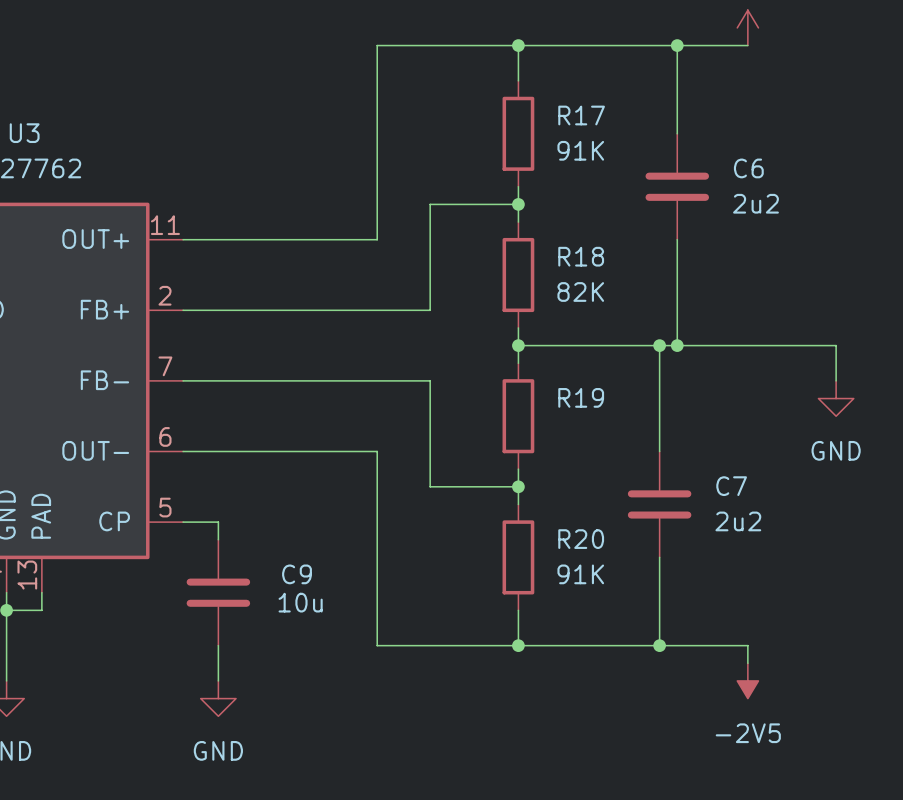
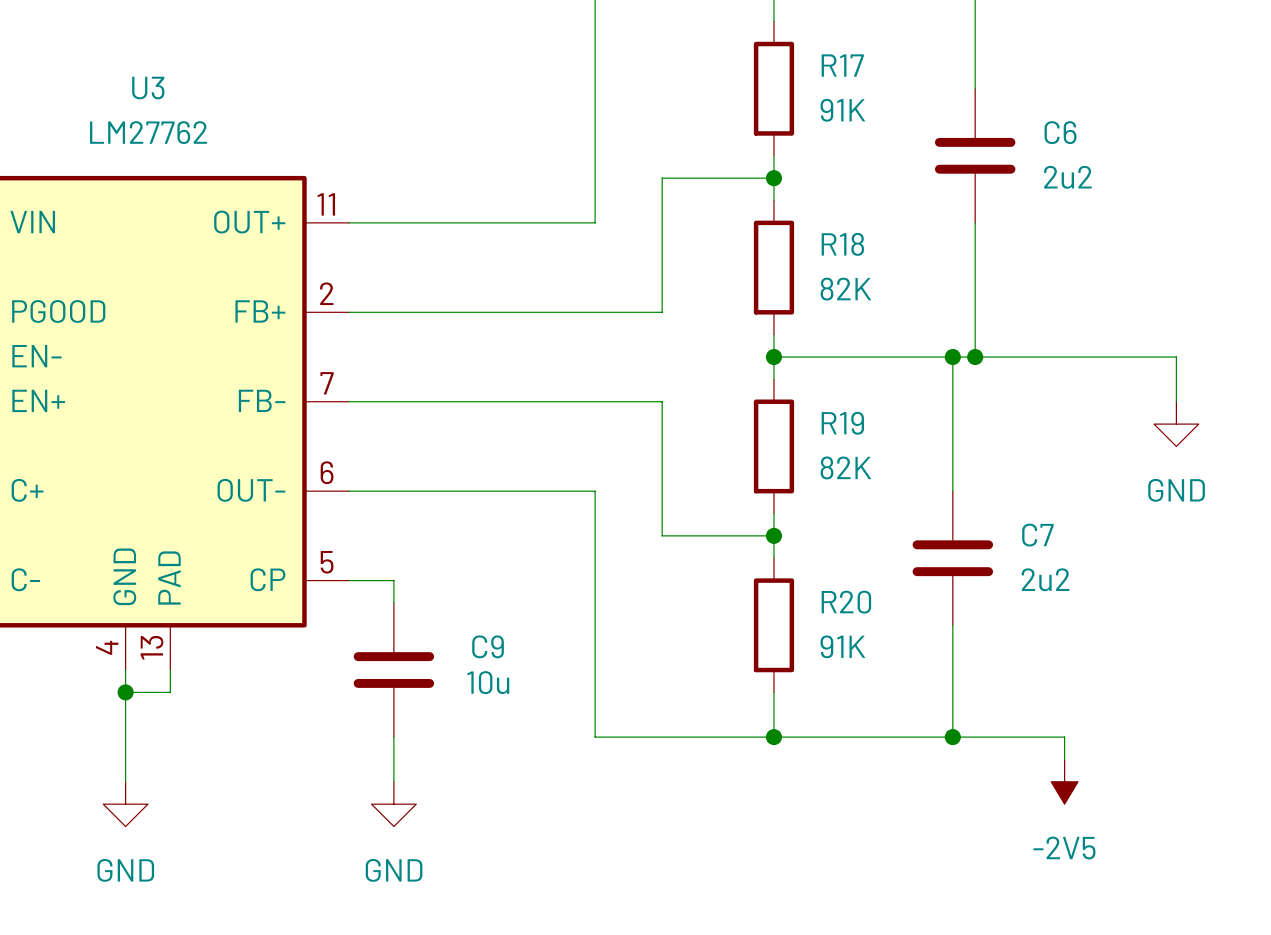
R19 value: none -> 82K (845, 467)

